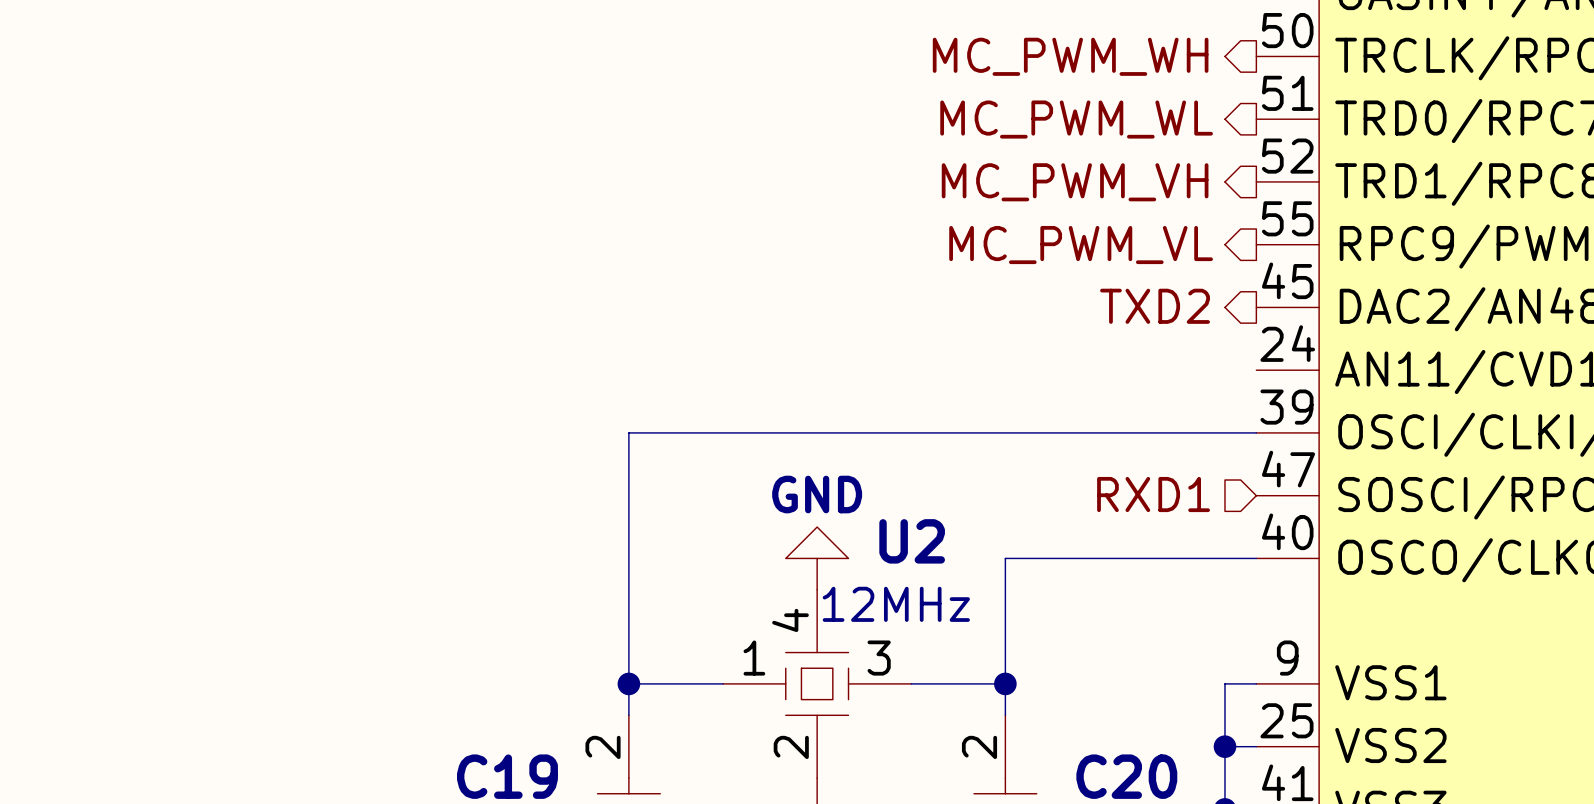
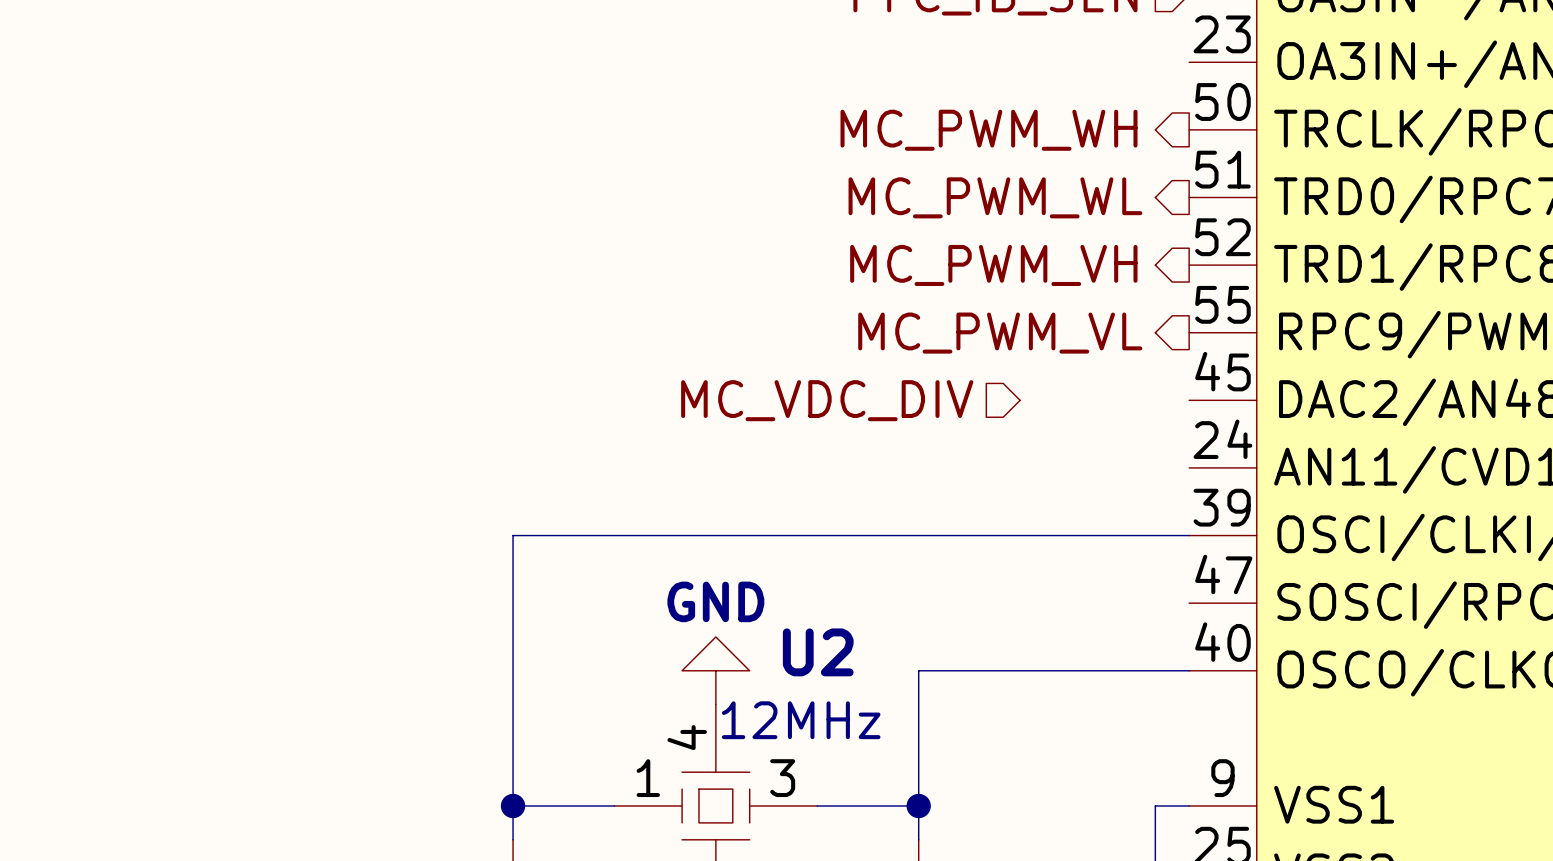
hierarchical label: TXD2 (1155, 306) -> none
hierarchical label: none -> MC_VDC_DIV (827, 400)
hierarchical label: RXD1 (1153, 494) -> none

